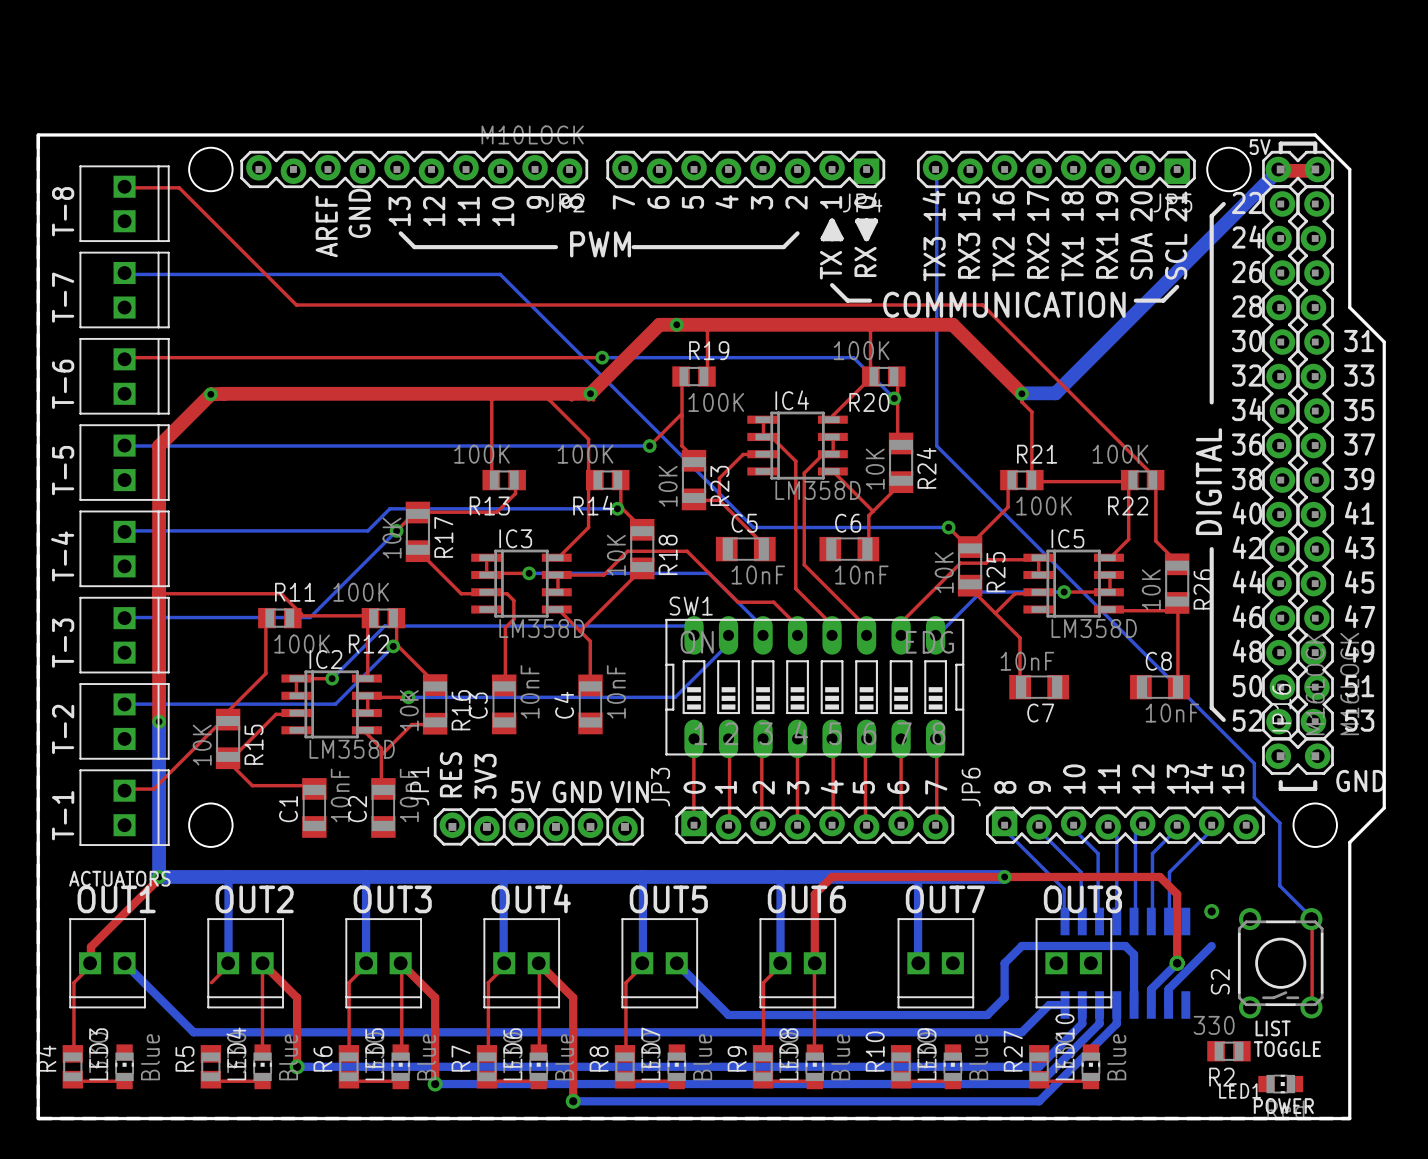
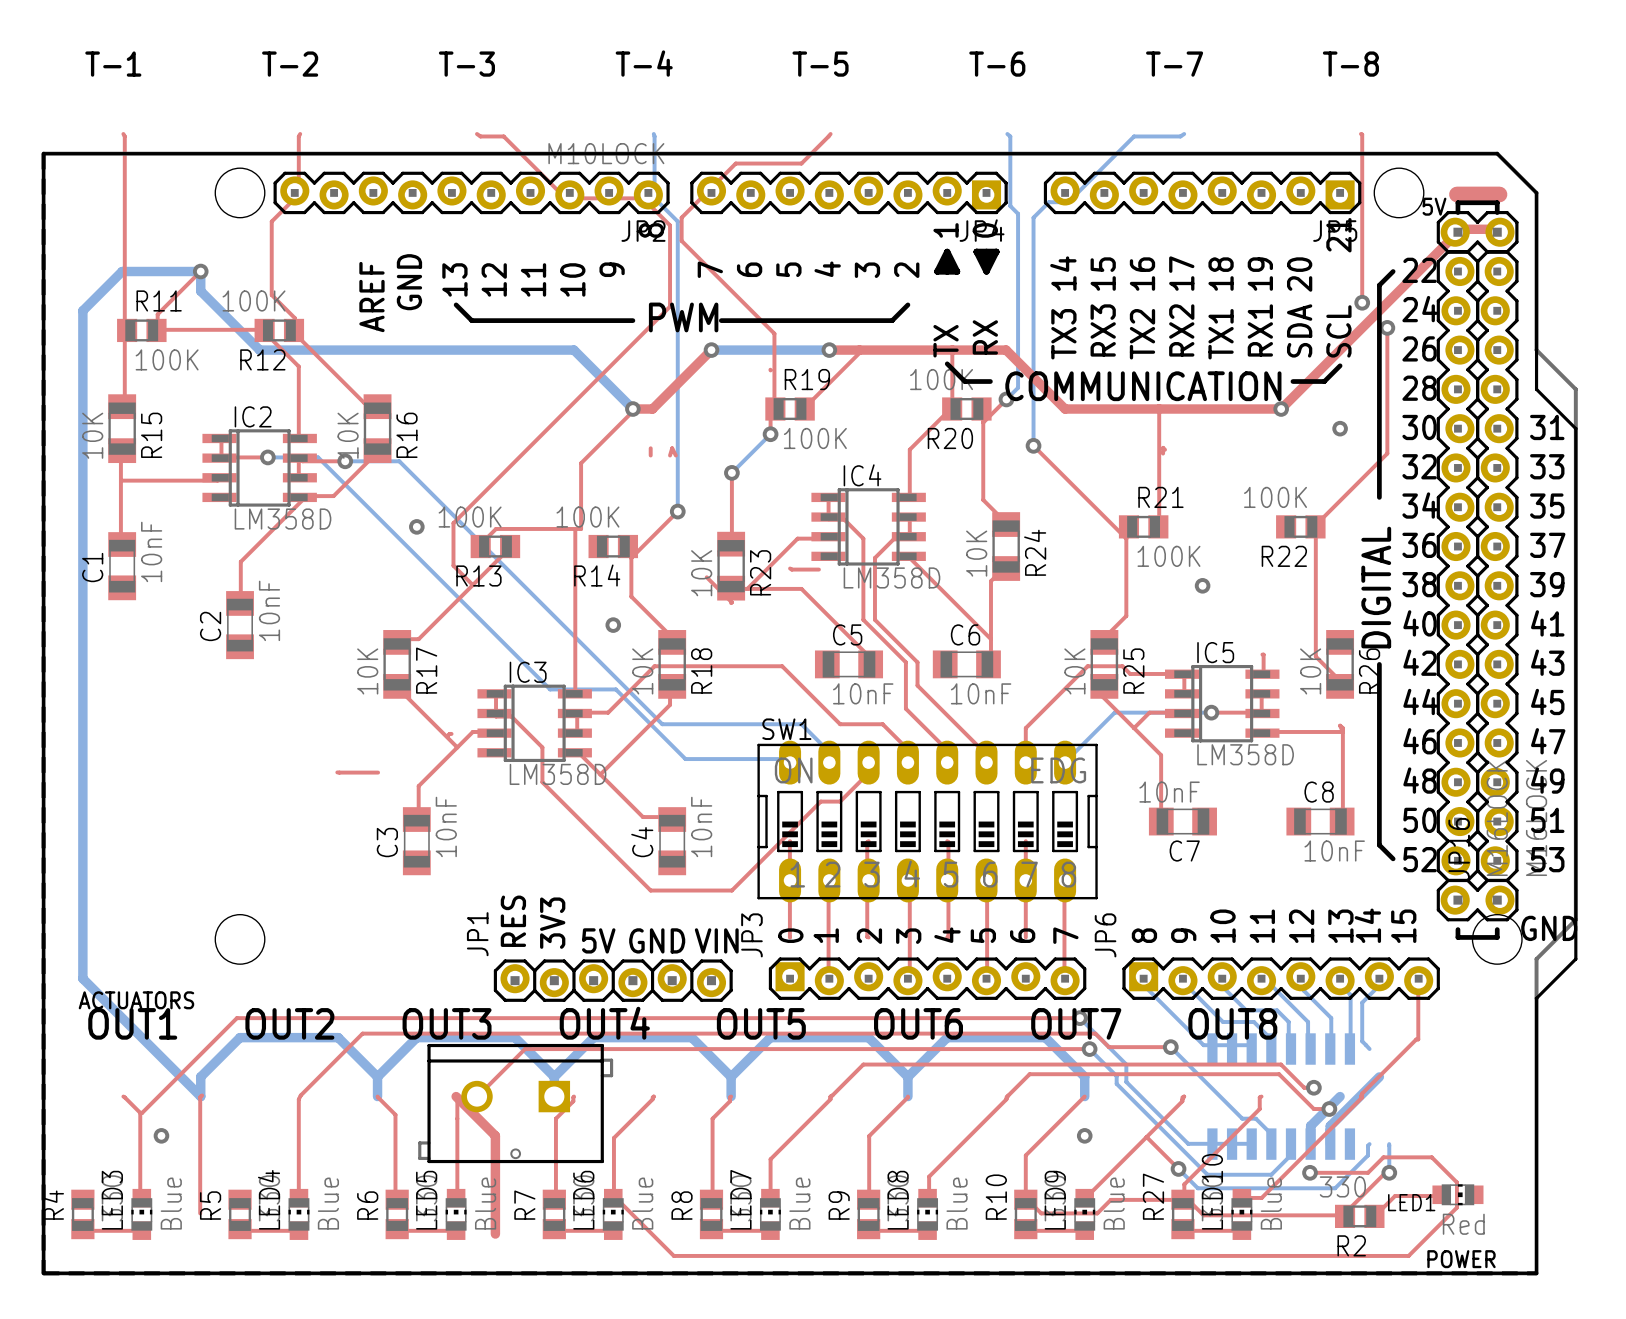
text: none -> T-4 (644, 63)
text: none -> T-1 (113, 64)
text: none -> T-2 (290, 64)
text: none -> T-3 (466, 64)
text: none -> T-5 (820, 64)
text: none -> T-6 (997, 64)
text: none -> T-7 (1174, 64)
text: none -> T-8 (1350, 64)
top track: none -> (123, 134) (124, 329) (127, 330) (124, 333) (124, 403) (122, 406)
top track: none -> (300, 134) (298, 194) (271, 221) (271, 295) (294, 318) (294, 333) (364, 403) (376, 403) (377, 406)
top track: none -> (476, 134) (480, 136) (503, 136) (565, 198) (642, 198) (670, 225) (670, 306) (453, 523) (453, 565) (472, 585)
bottom track: none -> (653, 134) (654, 198) (677, 221) (677, 511)
top track: none -> (830, 134) (801, 163) (735, 163) (681, 217) (681, 240) (774, 333) (775, 409) (770, 414) (770, 434)
bottom track: none -> (1007, 134) (1010, 136) (1010, 206) (1018, 213) (1018, 387) (1006, 399)
bottom track: none -> (1184, 134) (1180, 136) (1134, 136) (1068, 202) (1048, 202) (1033, 217) (1033, 445)
top track: none -> (1360, 134) (1362, 302)
text position: 5V (1260, 147) -> 5V (1434, 206)
line: (1280, 152) (1280, 143) (1315, 143) (1315, 152) -> (1457, 212) (1457, 202) (1497, 202) (1497, 212)
bottom track: (935, 167) (936, 445) (1254, 763) (1254, 797) (1279, 823) (1279, 885) (1311, 919) -> none
bottom track: (1278, 169) (1055, 393) (1021, 393) -> none
part position: (1297, 169) -> (1477, 232)
top track: (124, 186) (179, 187) (296, 305) (982, 305) (1154, 476) (1155, 481) -> (1387, 327) (1387, 453) (1315, 525) (1315, 548)
text position: 9 (537, 202) -> 9 (612, 269)
text position: 7 (623, 202) -> 7 (710, 269)
text position: 6 (658, 202) -> 6 (749, 269)
text position: 5 (692, 202) -> 5 (788, 269)
text position: 4 (727, 202) -> 4 (827, 269)
text position: 3 (762, 202) -> 3 (867, 270)
text position: 2 (796, 202) -> 2 (906, 270)
text: 22 (1247, 202) -> none
part: (124, 203) -> none
line: (1223, 203) (1211, 216) (1211, 250) -> (1393, 271) (1379, 285)
top track: none -> (1500, 232) (1497, 229) (1458, 229) (1455, 232) (1457, 232) (1281, 409) (1065, 409) (1006, 350) (829, 350)
text position: 14 (934, 205) -> 14 (1063, 273)
text position: 17 (1038, 205) -> 17 (1181, 273)
text position: 15 (969, 206) -> 15 (1103, 274)
text position: 16 (1003, 206) -> 16 (1142, 274)
text position: 18 (1072, 206) -> 18 (1221, 274)
text position: 19 (1107, 206) -> 19 (1260, 274)
text position: 20 (1141, 206) -> 20 (1299, 274)
text: T-8 (63, 211) -> none
text position: 13 (399, 211) -> 13 (454, 279)
text position: 12 (434, 211) -> 12 (494, 279)
text position: 11 (468, 211) -> 11 (533, 279)
text position: 10 (503, 211) -> 10 (572, 279)
text position: GND (359, 213) -> GND (409, 282)
text position: AREF (326, 226) -> AREF (371, 297)
line: (400, 233) (414, 247) (555, 247) -> (456, 304) (471, 320) (632, 320)
line: (797, 233) (783, 247) (633, 247) -> (907, 304) (892, 320) (721, 320)
text: 24 (1247, 237) -> 22 (1419, 270)
top track: none -> (200, 271) (157, 314) (156, 330) (264, 329) (298, 366) (299, 438)
via: none -> (200, 271)
text position: PWM (600, 244) -> PWM (683, 317)
text position: RX3 (969, 255) -> RX3 (1103, 330)
text position: RX2 (1038, 255) -> RX2 (1181, 330)
text position: RX1 (1107, 255) -> RX1 (1260, 330)
text position: SDA (1141, 256) -> SDA (1299, 330)
text position: SCL (1176, 256) -> SCL (1338, 331)
text position: TX3 (934, 259) -> TX3 (1063, 334)
text position: TX2 (1003, 259) -> TX2 (1142, 334)
text position: TX1 (1072, 259) -> TX1 (1221, 334)
text position: RX (865, 261) -> RX (985, 337)
text position: TX (831, 265) -> TX (946, 341)
via: none -> (1362, 302)
text: 26 (1247, 271) -> 24 (1420, 309)
bottom track: (124, 273) (500, 274) (753, 527) (948, 527) -> none
line: (832, 285) (847, 300) (870, 300) -> (947, 363) (964, 381) (990, 381)
line: (1177, 286) (1163, 300) (1135, 300) -> (1340, 365) (1324, 381) (1292, 381)
via: none -> (1387, 327)
part: (124, 290) -> none
text: T-7 (63, 297) -> none
text position: COMMUNICATION (1004, 304) -> COMMUNICATION (1143, 386)
text: 28 (1247, 306) -> 26 (1419, 348)
bottom track: none -> (711, 350) (829, 350)
top track: none -> (711, 350) (652, 409) (632, 409) (631, 412) (581, 463) (581, 528) (496, 528) (480, 546)
via: none -> (711, 350)
via: none -> (829, 350)
top track: none -> (859, 350) (859, 353) (804, 409)
top track: none -> (952, 350) (952, 409) (909, 449) (908, 497)
board edge: (1349, 307) (1384, 342) (1384, 376) -> (1536, 350) (1536, 389) (1575, 428)
via: (676, 324) -> none
top track: (707, 324) (706, 376) -> none
top track: (870, 324) (870, 376) -> none
text: 30 (1247, 341) -> 28 (1419, 388)
text: 31 (1359, 341) -> none
top track: none -> (1006, 399) (983, 422)
via: none -> (1006, 399)
bottom track: (602, 357) (853, 357) (894, 398) -> none
top track: (602, 357) (124, 357) (124, 359) -> none
via: (602, 357) -> none
bottom track: none -> (632, 409) (573, 350) (259, 350) (200, 291) (200, 271) (122, 271) (82, 310) (82, 978) (200, 1096) (200, 1076) (240, 1037) (338, 1037) (377, 1076)
via: none -> (632, 409)
top track: none -> (981, 409) (983, 411) (983, 499) (1006, 524)
top track: none -> (1159, 409) (1158, 526)
via: none -> (1281, 409)
text: 32 (1247, 375) -> 30 (1419, 427)
text: 33 (1359, 375) -> 31 (1547, 427)
part: (124, 376) -> none
top track: (681, 376) (681, 445) (695, 459) (694, 460) -> none
R19 position: (694, 376) -> (790, 409)
top track: (870, 376) (833, 415) (832, 419) -> none
R20 position: (883, 376) -> (966, 409)
top track: (896, 376) (897, 439) (901, 443) -> none
via: none -> (1340, 428)
bottom track: none -> (770, 434) (731, 472)
via: none -> (770, 434)
text: T-6 (63, 384) -> none
top track: none -> (219, 438) (221, 441) (221, 457)
top track: none -> (1033, 445) (1126, 538)
top track: (491, 393) (491, 480) -> none
top track: (549, 393) (549, 400) (588, 439) (588, 474) (594, 480) -> none
via: (590, 393) -> none
top track: (1021, 393) (1021, 401) (1031, 412) (1031, 476) (1034, 480) -> none
top track: (1021, 393) (952, 324) (659, 324) (590, 393) (210, 394) (159, 446) (159, 721) -> none
via: (1021, 393) -> none
via position: (210, 394) -> (267, 457)
top track: none -> (122, 450) (122, 544)
top track: none -> (377, 450) (333, 496) (299, 497) (302, 499) (240, 561) (240, 603)
via position: (894, 398) -> (1033, 445)
top track: none -> (221, 457) (267, 457)
bottom track: none -> (267, 457) (318, 457) (550, 689) (615, 689) (685, 759) (789, 759) (790, 762)
bottom track: none -> (345, 461) (399, 461) (662, 724) (801, 724) (828, 751) (829, 762)
top track: none -> (345, 461) (302, 461) (299, 458) (299, 477)
via: none -> (345, 461)
text: 34 (1247, 409) -> 32 (1419, 466)
text: 35 (1359, 410) -> 33 (1547, 466)
top track: none -> (731, 472) (731, 544)
via: none -> (731, 472)
top track: (681, 415) (649, 445) -> none
top track: none -> (219, 477) (217, 480) (120, 480)
top track: (762, 419) (762, 436) (770, 435) (795, 461) (795, 581) -> (828, 497) (828, 519) (844, 519) (863, 538) (863, 619) (905, 662)
top track: (832, 436) (832, 454) (822, 454) (804, 473) (804, 564) (865, 626) (866, 635) -> none
text: 36 (1247, 444) -> 34 (1420, 505)
text: 37 (1359, 444) -> 35 (1547, 506)
bottom track: (124, 445) (649, 445) -> none
via: (649, 445) -> none
IC4 position: (797, 445) -> (868, 526)
top track: none -> (677, 511) (631, 557) (627, 546) (631, 550) (631, 596) (673, 639) (672, 642)
via: none -> (677, 511)
top track: (762, 454) (743, 454) (719, 478) (719, 500) (763, 544) (764, 549) -> none
top track: none -> (908, 517) (908, 536) (905, 538) (894, 538) (874, 557) (874, 619) (917, 662) (917, 685) (983, 751) (983, 759) (986, 762)
part: (124, 462) -> none
via: none -> (416, 526)
R24 position: (901, 462) -> (1006, 546)
top track: none -> (1128, 526) (1126, 527) (1126, 615) (1103, 639) (1104, 642)
part position: (1280, 462) -> (1457, 566)
JP16 position: (1315, 462) -> (1497, 566)
top track: none -> (575, 528) (575, 693)
text: T-5 (63, 470) -> none
top track: none -> (828, 536) (824, 538) (797, 538) (747, 588)
top track: (833, 471) (873, 511) -> none
text: 38 (1247, 479) -> 36 (1419, 545)
text: 39 (1359, 479) -> 37 (1547, 545)
top track: none -> (510, 546) (418, 639) (399, 639) (397, 642)
R13 position: (504, 480) -> (495, 546)
top track: (517, 480) (515, 493) (496, 512) (418, 512) (413, 513) (396, 530) -> none
top track: (594, 480) (588, 479) (588, 527) (556, 557) -> none
R14 position: (607, 480) -> (613, 546)
top track: (620, 480) (620, 507) (617, 508) -> none
R23 position: (694, 480) -> (731, 566)
top track: (1008, 480) (1008, 507) (970, 547) (948, 527) -> none
R21 position: (1021, 480) -> (1143, 526)
top track: (1034, 480) (1035, 481) (1126, 481) (1129, 480) (1128, 539) (1108, 557) -> none
R22 position: (1142, 480) -> (1300, 526)
text position: DIGITAL (1208, 481) -> DIGITAL (1376, 587)
top track: (901, 482) (868, 515) (868, 549) -> none
top track: none -> (908, 556) (990, 639)
top track: none -> (1006, 568) (990, 581) (990, 662) (988, 664)
bottom track: (617, 508) (389, 508) (367, 530) (124, 531) -> none
via: (617, 508) -> none
text: 40 (1247, 513) -> 38 (1419, 584)
text: 41 (1359, 513) -> 39 (1547, 584)
via: none -> (1202, 585)
top track: none -> (731, 588) (801, 588) (867, 654) (867, 662) (870, 664)
via: (948, 527) -> none
bottom track: (396, 530) (310, 617) (124, 618) -> none
via: (396, 530) -> none
R17 position: (417, 531) -> (397, 664)
top track: (1155, 541) (1177, 564) -> (1315, 615) (1315, 656) (1340, 681)
text: 42 (1247, 547) -> 40 (1420, 623)
text: 43 (1359, 547) -> 41 (1547, 623)
part: (124, 548) -> none
via: none -> (613, 625)
R18 position: (642, 549) -> (672, 664)
C5 position: (745, 549) -> (849, 664)
C6 position: (849, 549) -> (966, 664)
line: (1211, 549) (1211, 583) -> (1379, 458) (1379, 497)
top track: (417, 551) (461, 593) (507, 593) (513, 600) (513, 619) (505, 627) (504, 685) -> none
text: T-4 (62, 556) -> none
top track: (486, 557) (486, 574) (488, 573) (529, 573) -> none
R25 position: (970, 566) -> (1104, 664)
top track: (642, 568) (580, 631) -> none
bottom track: (529, 573) (709, 573) (761, 626) (763, 635) -> none
via: (529, 573) -> none
top track: (1038, 574) (1038, 557) (1036, 559) (989, 559) (986, 563) (960, 563) (901, 622) (901, 635) -> none
text: 44 (1247, 582) -> 42 (1420, 662)
text: 45 (1359, 582) -> 43 (1547, 662)
IC3 position: (521, 583) -> (534, 723)
IC5 position: (1073, 583) -> (1222, 703)
top track: (970, 585) (969, 586) (1019, 637) (1019, 663) -> (1104, 686) (1103, 697) (1161, 755)
top track: (795, 588) (831, 624) (832, 635) -> (905, 670) (905, 708) (944, 747) (944, 759) (947, 762)
top track: (556, 592) (556, 574) (603, 575) (627, 551) (687, 551) (738, 602) (773, 602) (797, 626) (797, 635) -> none
top track: (1038, 592) (1014, 593) (995, 613) -> none
bottom track: (1064, 592) (980, 592) (935, 635) -> none
top track: (1064, 592) (1108, 592) -> none
via position: (1064, 592) -> (1211, 712)
top track: (159, 593) (281, 593) (301, 614) (292, 618) (293, 615) (367, 615) (370, 618) (367, 619) (366, 678) -> none
top track: none -> (397, 686) (457, 747)
top track: none -> (672, 686) (670, 689) (670, 704) (600, 774)
top track: none -> (494, 693) (496, 716) (511, 716) (542, 747) (542, 782) (650, 890) (731, 890) (820, 801) (840, 801) (867, 774) (868, 762)
top track: (556, 609) (590, 641) (590, 685) -> none
top track: none -> (1182, 693) (1184, 693) (1184, 677) (1182, 674) (1130, 673) (1122, 666) (1087, 666) (1025, 728) (1025, 762)
top track: (1108, 609) (1176, 610) (1177, 602) (1178, 687) -> (1262, 693) (1261, 712)
text: 46 (1247, 616) -> 44 (1420, 701)
text: 47 (1360, 616) -> 45 (1547, 701)
top track: (266, 618) (265, 673) (228, 710) (228, 719) (225, 717) (153, 789) (126, 789) (124, 790) -> none
R11 position: (279, 618) -> (141, 330)
R12 position: (383, 618) -> (279, 330)
top track: (396, 618) (396, 644) (435, 685) -> none
top track: none -> (1182, 713) (1149, 712) (1134, 728)
bottom track: none -> (1211, 712) (1114, 712) (1065, 762)
top track: none -> (1211, 712) (1261, 712)
part: (124, 635) -> none
bottom track: (694, 635) (685, 626) (384, 626) (332, 678) -> none
bottom track: (728, 635) (727, 644) (675, 697) (408, 697) -> none
text: T-3 (63, 643) -> none
top track: none -> (574, 733) (577, 731) (577, 716) (574, 713) (608, 712) (654, 666) (782, 666) (840, 724) (882, 724) (905, 747) (905, 759) (907, 762)
top track: none -> (1262, 733) (1265, 731) (1342, 731) (1340, 725) (1342, 728) (1342, 820) (1342, 821)
bottom track: (393, 646) (335, 704) (124, 704) -> none
via: (393, 646) -> none
text: 48 (1247, 651) -> 46 (1420, 741)
text: 49 (1359, 651) -> 47 (1548, 741)
top track: none -> (574, 752) (577, 751) (642, 817) (670, 817) (672, 819)
top track: (296, 678) (296, 695) -> none
via: (332, 678) -> none
text: 50 (1247, 686) -> 48 (1420, 780)
text: 51 (1359, 686) -> 49 (1547, 780)
SW1 position: (814, 687) -> (927, 821)
top track: none -> (1161, 782) (1161, 821)
C7 position: (1039, 687) -> (1182, 821)
C8 position: (1159, 687) -> (1320, 821)
top track: (367, 697) (366, 695) (408, 697) -> (418, 793) (418, 786) (472, 731) (494, 733)
via: (408, 697) -> none
IC2 position: (331, 704) -> (259, 467)
R16 position: (435, 704) -> (377, 428)
C3 position: (504, 704) -> (416, 841)
C4 position: (590, 704) -> (672, 841)
line: (1211, 707) (1223, 719) -> (1379, 805) (1379, 845) (1393, 858)
top track: (296, 713) (276, 714) (228, 761) (228, 758) (225, 758) (252, 785) (313, 785) (314, 788) -> none
text: 52 (1247, 720) -> 50 (1420, 820)
text: 53 (1359, 720) -> 51 (1547, 820)
part: (124, 721) -> none
bottom track: (159, 721) (159, 876) (1004, 876) -> none
via: (159, 721) -> none
top track: (435, 723) (411, 724) (381, 755) -> none
text: T-2 (63, 729) -> none
top track: (366, 730) (364, 731) (381, 748) (381, 785) (383, 788) -> none
R15 position: (228, 738) -> (122, 428)
top track: (728, 738) (728, 826) -> none
top track: (797, 738) (797, 826) -> none
top track: (866, 738) (866, 826) -> none
top track: (935, 738) (935, 826) -> none
text: none -> 52 (1420, 859)
text: none -> 53 (1547, 859)
part position: (1297, 756) -> (1477, 900)
top track: none -> (829, 880) (829, 980)
top track: none -> (907, 880) (909, 882) (909, 979) (907, 980)
top track: none -> (986, 880) (986, 980)
top track: none -> (1065, 880) (1065, 980)
text position: RES (450, 774) -> RES (513, 921)
text position: 3V3 (485, 776) -> 3V3 (552, 923)
text position: 14 (1201, 778) -> 14 (1367, 925)
text position: 10 (1074, 779) -> 10 (1223, 926)
text position: 11 (1108, 779) -> 11 (1262, 926)
text position: 12 (1143, 779) -> 12 (1301, 926)
text position: 13 (1177, 779) -> 13 (1340, 926)
text position: 15 (1233, 779) -> 15 (1403, 926)
text position: GND (1360, 781) -> GND (1549, 928)
line: (1280, 782) (1280, 788) (1315, 788) (1315, 782) -> (1457, 929) (1457, 937) (1497, 937) (1497, 929)
text position: 4 (832, 786) -> 4 (947, 935)
text position: 0 (694, 787) -> 0 (790, 935)
text position: 1 (725, 787) -> 1 (826, 935)
text position: 2 (763, 787) -> 2 (869, 936)
text position: 3 (798, 787) -> 3 (908, 936)
text position: 5 (863, 787) -> 5 (983, 935)
text position: 6 (898, 787) -> 6 (1022, 935)
text position: 7 (936, 787) -> 7 (1065, 935)
text position: 8 (1005, 787) -> 8 (1144, 935)
text position: 9 (1039, 787) -> 9 (1183, 935)
text position: 5V (525, 792) -> 5V (598, 940)
text position: GND (577, 792) -> GND (657, 940)
text position: VIN (629, 792) -> VIN (716, 940)
part: (124, 807) -> none
C1 position: (314, 807) -> (122, 566)
C2 position: (383, 807) -> (240, 625)
board edge: (1384, 807) (1349, 842) (1349, 876) -> (1575, 919) (1575, 959) (1536, 998)
text: T-1 (63, 815) -> none
bottom track: (1004, 823) (1004, 829) (1064, 889) (1065, 921) -> none
bottom track: (1073, 823) (1074, 829) (1098, 853) (1099, 921) -> (1143, 976) (1145, 987) (1203, 1045) (1250, 1045) (1251, 1049)
bottom track: (1142, 823) (1135, 831) (1134, 921) -> (1222, 976) (1223, 987) (1246, 1010) (1277, 1010) (1288, 1022) (1288, 1045) (1290, 1049)
bottom track: (1211, 823) (1210, 831) (1169, 872) (1169, 894) -> (1300, 976) (1304, 979) (1304, 991) (1331, 1018)
JP3 position: (814, 825) -> (927, 978)
JP6 position: (1125, 825) -> (1281, 978)
JP1 position: (538, 826) -> (613, 980)
bottom track: (1039, 826) (1040, 831) (1081, 872) (1082, 921) -> none
bottom track: (1108, 826) (1116, 836) (1116, 921) -> (1182, 980) (1223, 1022) (1253, 1022) (1269, 1037) (1271, 1049)
bottom track: (1177, 826) (1152, 853) (1151, 921) -> (1261, 980) (1261, 983) (1269, 983) (1308, 1022) (1308, 1045) (1310, 1049)
bottom track: none -> (1379, 976) (1377, 987) (1362, 1002) (1362, 1041) (1369, 1049)
bottom track: none -> (1340, 980) (1339, 983) (1350, 994) (1349, 1049)
top track: none -> (1418, 980) (1418, 1039) (1360, 1096)
top track: (159, 876) (160, 877) (90, 947) (89, 967) (73, 982) (72, 1053) -> none
via: (159, 876) -> none
bottom track: (228, 876) (228, 963) -> none
bottom track: (366, 876) (366, 963) -> none
bottom track: (503, 876) (504, 963) -> none
bottom track: (642, 876) (642, 963) -> (731, 1076) (731, 1096)
bottom track: (780, 876) (780, 963) -> none
bottom track: (918, 876) (918, 963) -> none
via: (1004, 876) -> none
top track: none -> (1079, 1018) (236, 1018) (140, 1112)
via: none -> (1079, 1018)
via: (1211, 911) -> none
via: none -> (1170, 1047)
top track: (1311, 919) (1311, 1007) -> none
top track: none -> (1089, 1049) (525, 1049) (476, 1097)
via: none -> (1089, 1049)
bottom track: none -> (377, 1076) (377, 1096)
bottom track: none -> (377, 1076) (416, 1037) (515, 1037) (554, 1076)
bottom track: none -> (554, 1076) (593, 1037) (691, 1037) (731, 1076)
bottom track: none -> (731, 1076) (770, 1037) (868, 1037) (907, 1076)
bottom track: none -> (907, 1076) (907, 1096)
bottom track: none -> (907, 1076) (947, 1037) (1045, 1037) (1084, 1076) (1084, 1096)
top track: none -> (1313, 1087) (1304, 1087) (1281, 1064) (863, 1064) (830, 1096)
via: none -> (1313, 1087)
top track: none -> (202, 1095) (200, 1097) (200, 1213)
part: (107, 963) -> none
top track: none -> (123, 1096) (140, 1112)
bottom track: (124, 963) (193, 1032) (1021, 1032) (1049, 1005) (1065, 1005) -> none
top track: (228, 963) (226, 967) (211, 982) -> none
part: (245, 963) -> none
top track: (366, 963) (367, 964) (349, 982) (348, 1053) -> (377, 1096) (395, 1114) (395, 1197) (397, 1199)
part: (383, 963) -> none
part: (521, 963) -> none
part: (659, 963) -> none
bottom track: (676, 963) (728, 1015) (987, 1015) (1004, 997) (1004, 963) (1021, 946) (1125, 946) (1134, 954) (1134, 1005) -> (1089, 1049) (1116, 1076) (1116, 1083) (1207, 1174) (1271, 1174) (1290, 1155) (1290, 1144)
top track: none -> (830, 1096) (830, 1099) (770, 1159) (770, 1197)
top track: (780, 963) (778, 967) (763, 982) (763, 997) -> (907, 1096) (869, 1136)
part: (797, 963) -> none
top track: none -> (1007, 1096) (1029, 1074) (1279, 1074) (1313, 1109) (1329, 1109)
part: (935, 963) -> none
top track: none -> (1084, 1096) (1025, 1155) (1025, 1199) (1041, 1213) (1097, 1213) (1110, 1199) (1182, 1199)
part: (1073, 963) -> none
top track: none -> (1261, 1096) (1259, 1097) (1259, 1109) (1184, 1184) (1182, 1199)
top track: (1177, 963) (1177, 894) (1159, 876) (832, 876) (814, 894) (814, 1052) -> (1007, 1096) (929, 1176) (929, 1197) (927, 1198)
via: (1177, 963) -> none
top track: none -> (1360, 1096) (1362, 1097) (1261, 1197) (1241, 1198)
S2: (1280, 963) -> none
top track: none -> (1182, 1097) (1184, 1096) (1182, 1101) (1084, 1198)
top track: (262, 965) (262, 963) (297, 997) (297, 1066) -> (298, 1099) (362, 1033) (1095, 1033) (1108, 1047) (1170, 1047)
part: none -> (515, 1103)
via: none -> (1329, 1109)
top track: none -> (140, 1112) (140, 1197) (141, 1198)
via: none -> (161, 1135)
via: none -> (1084, 1135)
top track: none -> (1146, 1137) (1178, 1168)
top track: (539, 999) (538, 963) (573, 997) (573, 1101) -> (613, 1138) (652, 1097)
bottom track: (1082, 1005) (1082, 1023) (1039, 1066) (297, 1066) -> none
bottom track: (1099, 1005) (1099, 1023) (1039, 1084) (435, 1084) -> (1251, 1144) (1188, 1143) (1126, 1081) (1126, 1064) (1079, 1018)
bottom track: (1116, 1005) (1116, 1023) (1039, 1101) (573, 1101) -> (1271, 1144) (1271, 1134) (1255, 1118) (1242, 1118) (1170, 1047)
bottom track: none -> (1369, 1144) (1368, 1155) (1335, 1188) (1197, 1188) (1178, 1168)
bottom track: none -> (1389, 1144) (1389, 1172)
via: none -> (1178, 1168)
text: LIST (1273, 1028) -> none
top track: none -> (1310, 1172) (1368, 1172) (1383, 1157) (1431, 1157) (1456, 1182) (1456, 1207) (1408, 1255) (673, 1255) (615, 1197) (613, 1198)
via: none -> (1310, 1172)
top track: none -> (1389, 1172) (1385, 1172) (1344, 1213) (1345, 1216) (1203, 1215) (1186, 1197) (1182, 1199)
via: none -> (1389, 1172)
top track: none -> (1441, 1194) (1395, 1196) (1374, 1216)
text: TOGGLE (1287, 1049) -> none
R2 position: (1228, 1051) -> (1359, 1216)
via: (297, 1066) -> none
via: (435, 1084) -> none
LED1 position: (1280, 1084) -> (1457, 1194)
via: (573, 1101) -> none

